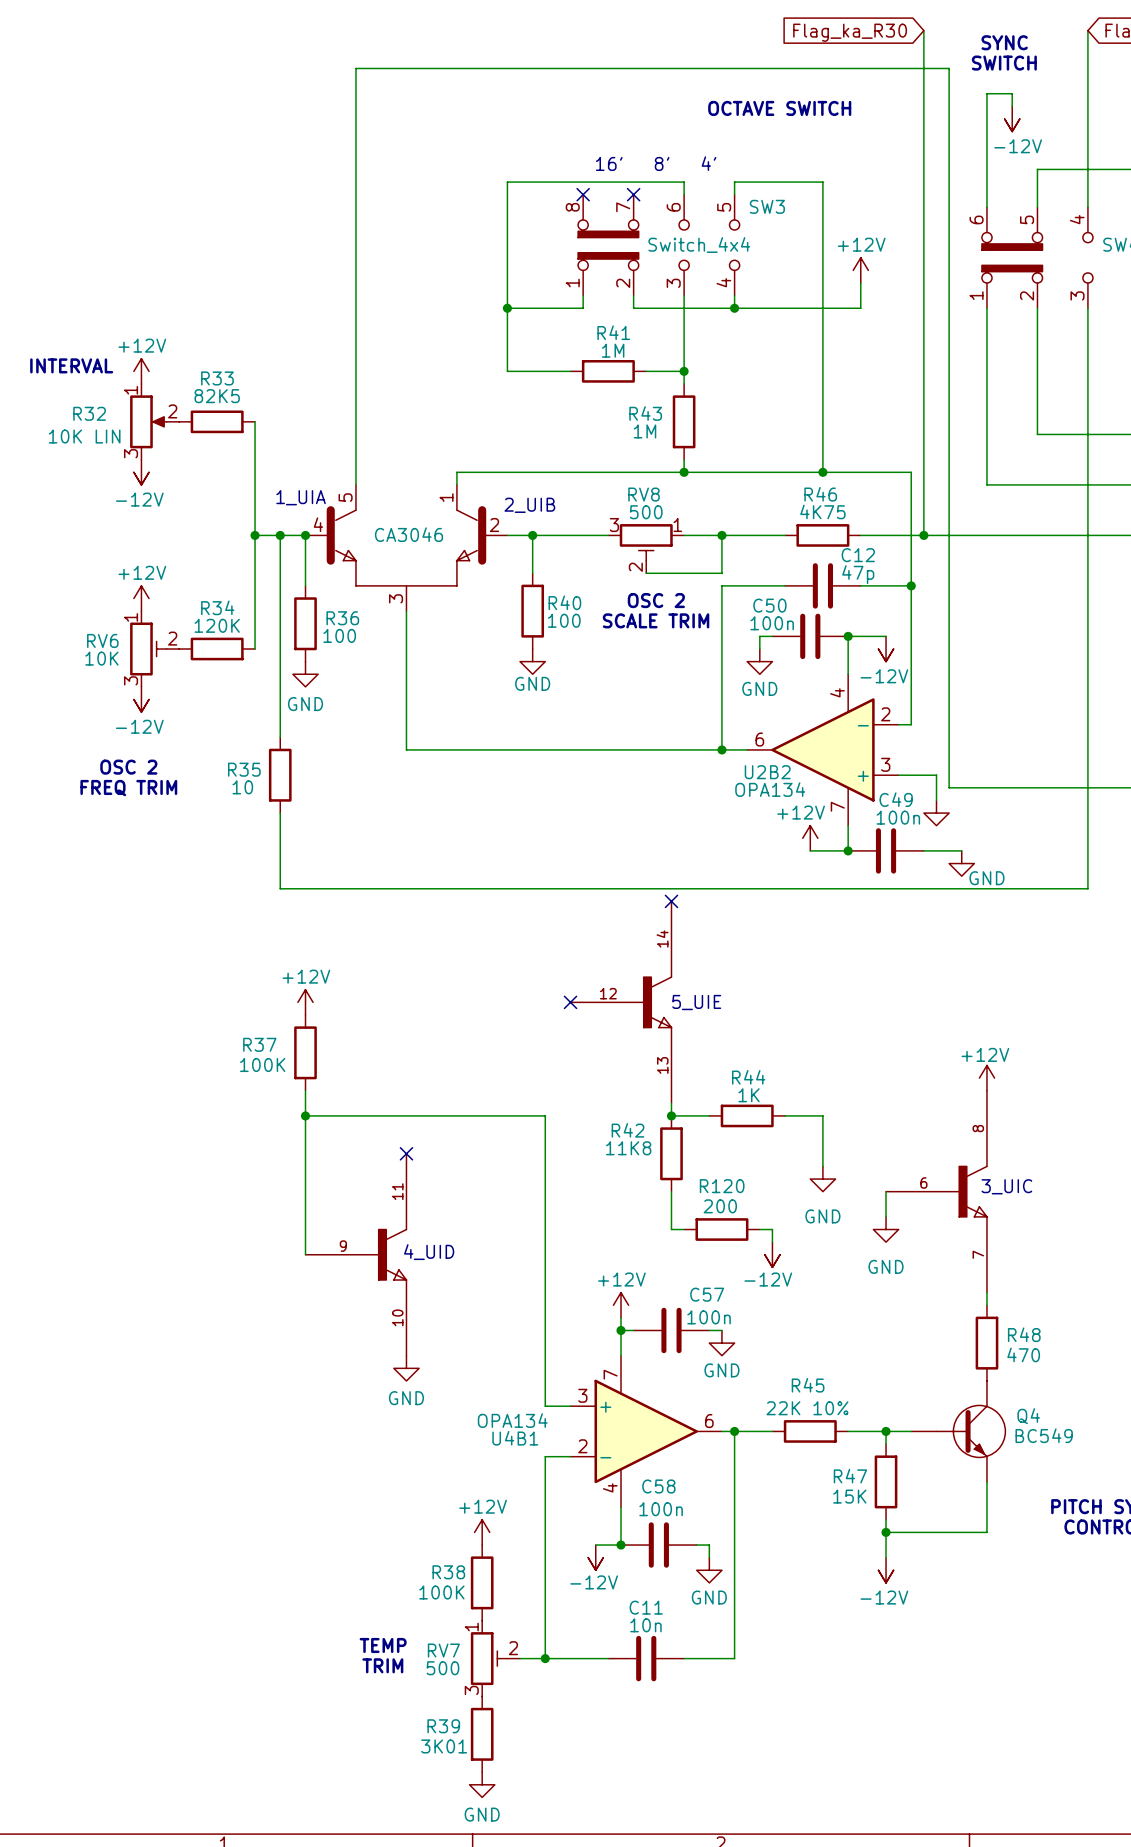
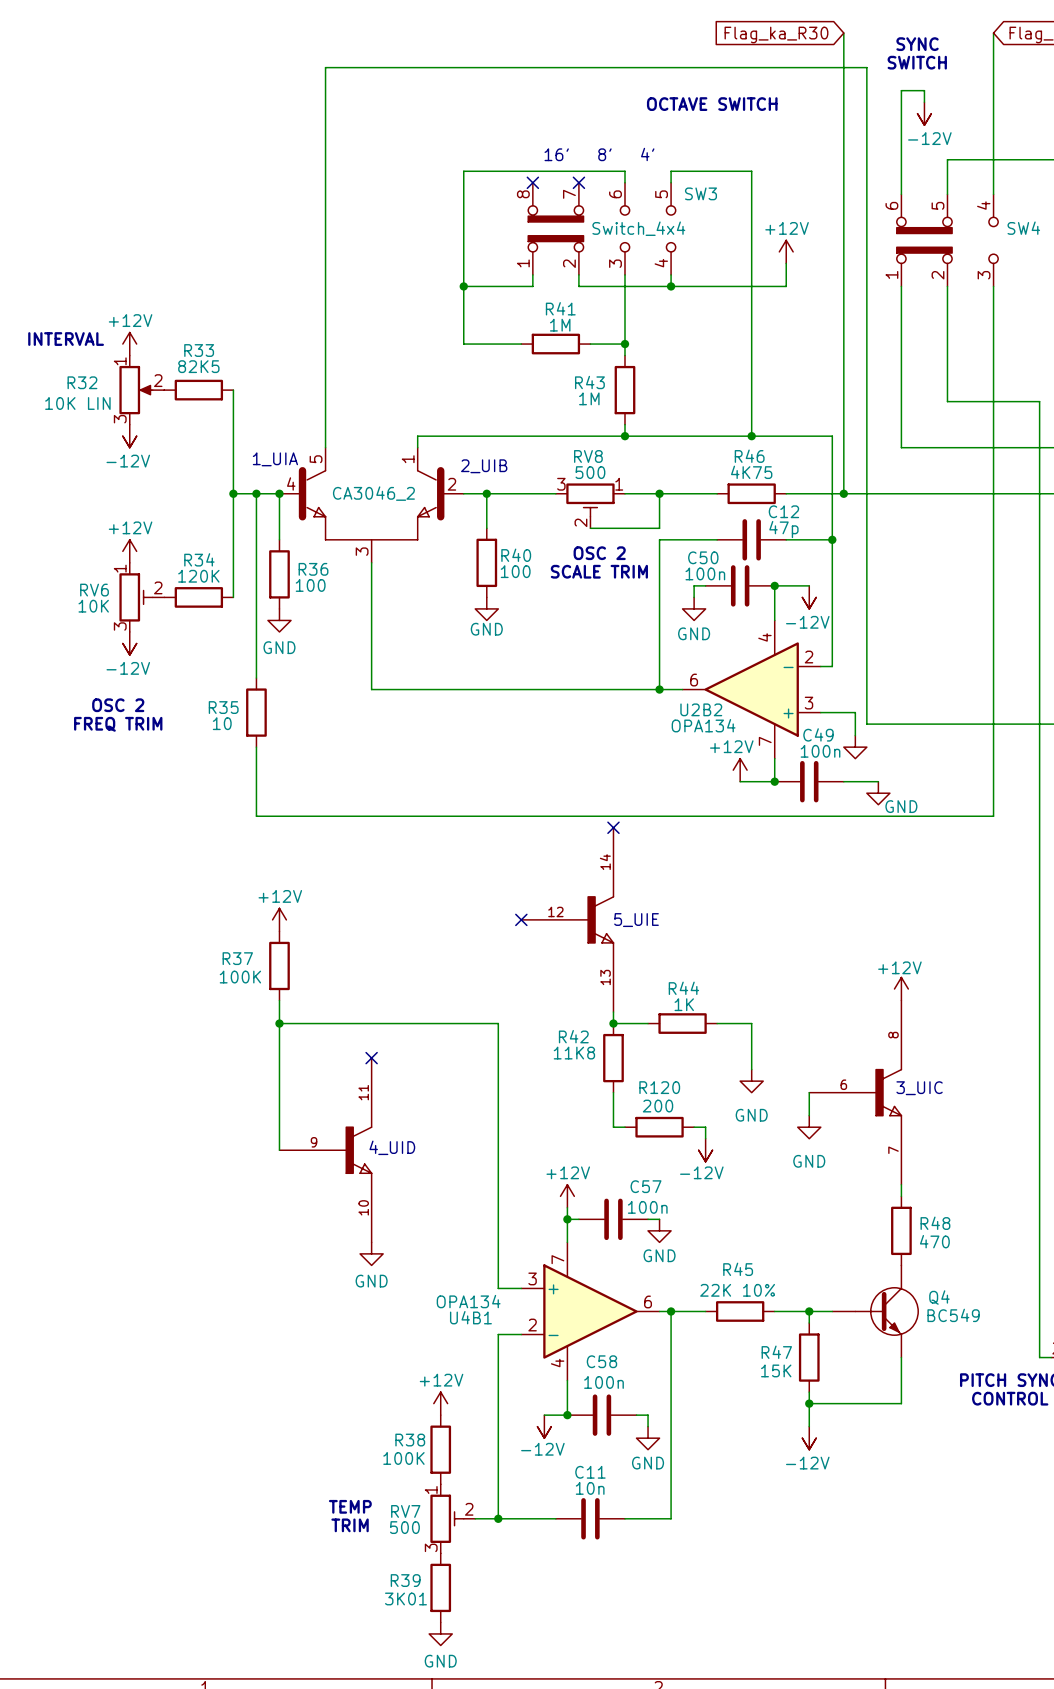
CA3046 name: CA3046 (408, 534) -> CA3046_2 (373, 493)

